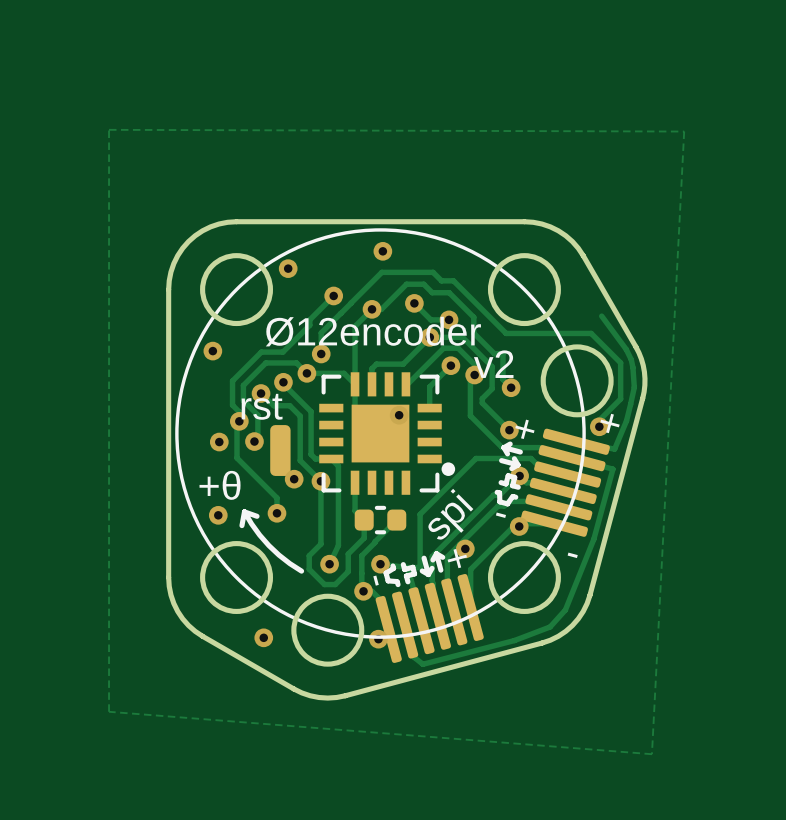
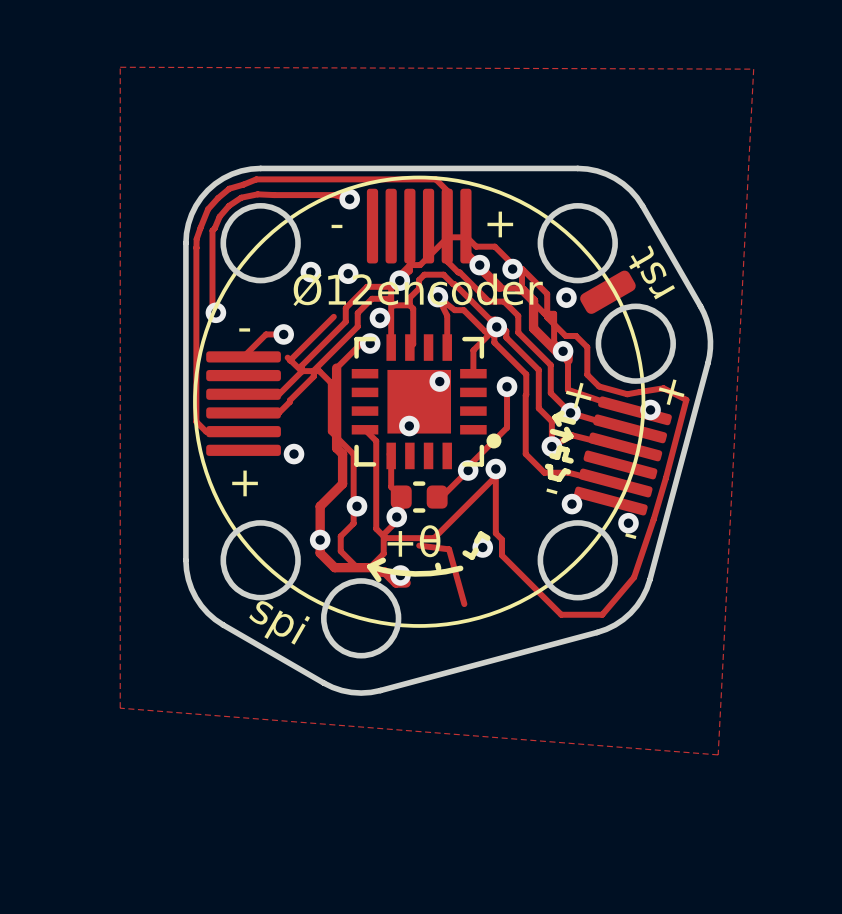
track: none -> (349, 199) (334, 195) (257, 194) (241, 197) (228, 205) (219, 216) (212, 230) (212, 309) (215, 312)
via: none -> (349, 199)
via: (382, 251) -> none
via: (288, 268) -> none
text: none -> + (500, 224)
text: none -> - (336, 226)
part: none -> (419, 226)
track: none -> (465, 226) (465, 251) (500, 288) (522, 290) (533, 300) (533, 328) (560, 355)
track: none -> (409, 244) (409, 270) (393, 286) (367, 286) (345, 308) (345, 321) (301, 365) (301, 371) (279, 394) (243, 394)
track: (333, 295) (309, 319) (309, 325) (282, 352) (261, 352) (232, 380) (232, 405) (239, 411) (239, 421) (236, 423) (236, 458) (276, 498) (276, 513) -> none
via: (333, 295) -> none
track: (414, 303) (430, 319) (449, 319) -> none
via: (414, 303) -> none
via position: (372, 309) -> (399, 280)
via: none -> (479, 265)
track: none -> (512, 269) (522, 269) (547, 293) (547, 317) (565, 335) (576, 335) (587, 347) (587, 374) (598, 386) (627, 394) (663, 388) (686, 399) (665, 478) (634, 577) (602, 614) (561, 614) (501, 555) (501, 539) (495, 533) (495, 469)
via: none -> (512, 269)
via: none -> (310, 272)
track: (601, 316) (626, 349) (631, 359) (634, 387) (626, 420) (614, 449) (576, 441) -> (568, 360) (568, 355) (567, 389) (634, 412) (634, 410)
via: none -> (348, 273)
via: (449, 319) -> none
part: none -> (607, 292)
via: (429, 337) -> none
via: none -> (437, 297)
via: none -> (566, 297)
track: none -> (409, 305) (409, 297) (419, 288) (419, 280) (424, 274) (443, 274) (490, 319) (494, 319) (506, 331) (506, 337) (538, 370) (538, 408) (551, 421) (551, 446) (572, 435) (624, 448)
track: none -> (409, 305) (394, 305) (387, 298) (371, 298) (357, 313) (357, 326) (313, 370) (313, 376) (278, 412) (247, 412)
via position: (212, 351) -> (215, 312)
track: (321, 353) (321, 332) (381, 272) (433, 272) (441, 280) (453, 280) (506, 333) (591, 333) (620, 362) (620, 399) (599, 420) (599, 426) -> none
via: (321, 353) -> none
track: none -> (333, 316) (289, 360)
via: none -> (379, 318)
text: v2 (493, 364) -> none
text: none -> - (244, 329)
track: none -> (283, 334) (266, 334) (243, 356)
via: none -> (283, 334)
via: (306, 373) -> none
via: (474, 375) -> none
track: none -> (370, 343) (361, 343) (336, 368) (336, 448) (342, 454) (342, 483) (320, 506) (320, 553) (334, 567) (374, 567) (379, 572) (385, 572) (396, 582) (406, 582)
via: none -> (370, 343)
track: (283, 382) (311, 411) (311, 454) (315, 458) (331, 458) -> none
via: (283, 382) -> none
track: (372, 384) (372, 368) (376, 364) (403, 364) (429, 337) (462, 337) (492, 366) (492, 388) (482, 398) (482, 403) (509, 430) -> (409, 347) (413, 344) (413, 308) (409, 305)
track: (405, 384) (443, 348) (458, 348) (474, 364) (474, 375) (470, 379) (470, 415) (502, 447) (540, 447) (543, 450) -> (447, 347) (447, 315) (437, 297) (454, 310) (463, 310) (485, 331) (489, 331) (494, 336) (494, 342) (526, 374) (525, 454) (544, 472) (568, 472) (615, 484)
via: (261, 393) -> none
text rotation: 0° (262, 406) -> 120° counterclockwise (652, 272)
text position: rst (262, 406) -> rst (652, 272)
via: none -> (507, 386)
via: (239, 421) -> none
via position: (599, 426) -> (650, 409)
via position: (509, 430) -> (570, 412)
track: (380, 433) (355, 408) (355, 384) (344, 373) (306, 373) (296, 362) (265, 362) (243, 385) (243, 400) (257, 415) (257, 438) (254, 441) -> none
part: none -> (243, 403)
via: (254, 441) -> none
via: (219, 442) -> none
part: (280, 450) -> none
via: none -> (409, 426)
track: (572, 458) (612, 469) (593, 539) (565, 610) (550, 626) (514, 640) (422, 664) (414, 657) (409, 638) -> none
track: none -> (629, 430) (570, 412) (550, 393) (550, 365) (518, 332) (518, 315) (504, 301) (489, 301) (447, 261) (447, 190) (435, 179) (256, 179) (229, 188) (218, 198) (208, 209) (196, 239) (196, 421) (206, 431) (247, 431)
track: (538, 465) (530, 458) (476, 458) (420, 514) (420, 567) (407, 567) -> none
track: (338, 466) (338, 545) (329, 564) -> (372, 437) (376, 440) (376, 528) (385, 538) (434, 538) (495, 476)
via: none -> (551, 446)
via: (519, 475) -> none
via: (294, 479) -> none
via: none -> (294, 454)
via: (320, 481) -> none
track: (534, 482) (526, 482) (519, 475) (512, 475) (509, 478) (509, 484) (499, 495) (493, 495) (432, 556) (433, 596) -> none
text position: +θ (220, 485) -> +θ (413, 541)
via: none -> (495, 469)
via: none -> (468, 470)
track: (531, 501) (508, 501) (504, 505) (498, 505) (447, 556) (447, 584) -> none
text: none -> + (245, 483)
line: (244, 511) (257, 516) -> none
line: (244, 511) (241, 525) -> none
line: (244, 511) (268, 545) (301, 571) -> none
via: (276, 513) -> none
text rotation: 0° (450, 514) -> 75° clockwise (279, 622)
text position: spi (450, 514) -> spi (279, 622)
via: (218, 515) -> none
track: (396, 520) (361, 555) (361, 589) (372, 591) (380, 599) -> (437, 497) (441, 497) (468, 470) (468, 466) (507, 427) (507, 386)
track: (554, 523) (522, 523) (519, 526) (513, 526) (470, 569) (470, 607) -> none
via: none -> (357, 506)
via: none -> (396, 517)
via: none -> (628, 523)
via: (465, 548) -> none
line: (436, 553) (440, 570) -> none
line: (424, 558) (428, 574) -> none
text: + (457, 558) -> none
via: none -> (320, 540)
via: (329, 564) -> none
via: (380, 564) -> none
line: (403, 564) (404, 569) (412, 567) (414, 573) (406, 576) (407, 581) -> none
via: none -> (482, 547)
line: (392, 566) (393, 568) (386, 573) (388, 580) (397, 581) -> none
line: none -> (383, 560) (369, 566)
text: - (376, 580) -> none
line: none -> (369, 566) (378, 579)
line: none -> (369, 566) (415, 573) (460, 568)
part: (429, 618) -> none
via: (263, 637) -> none
via: (378, 639) -> none

